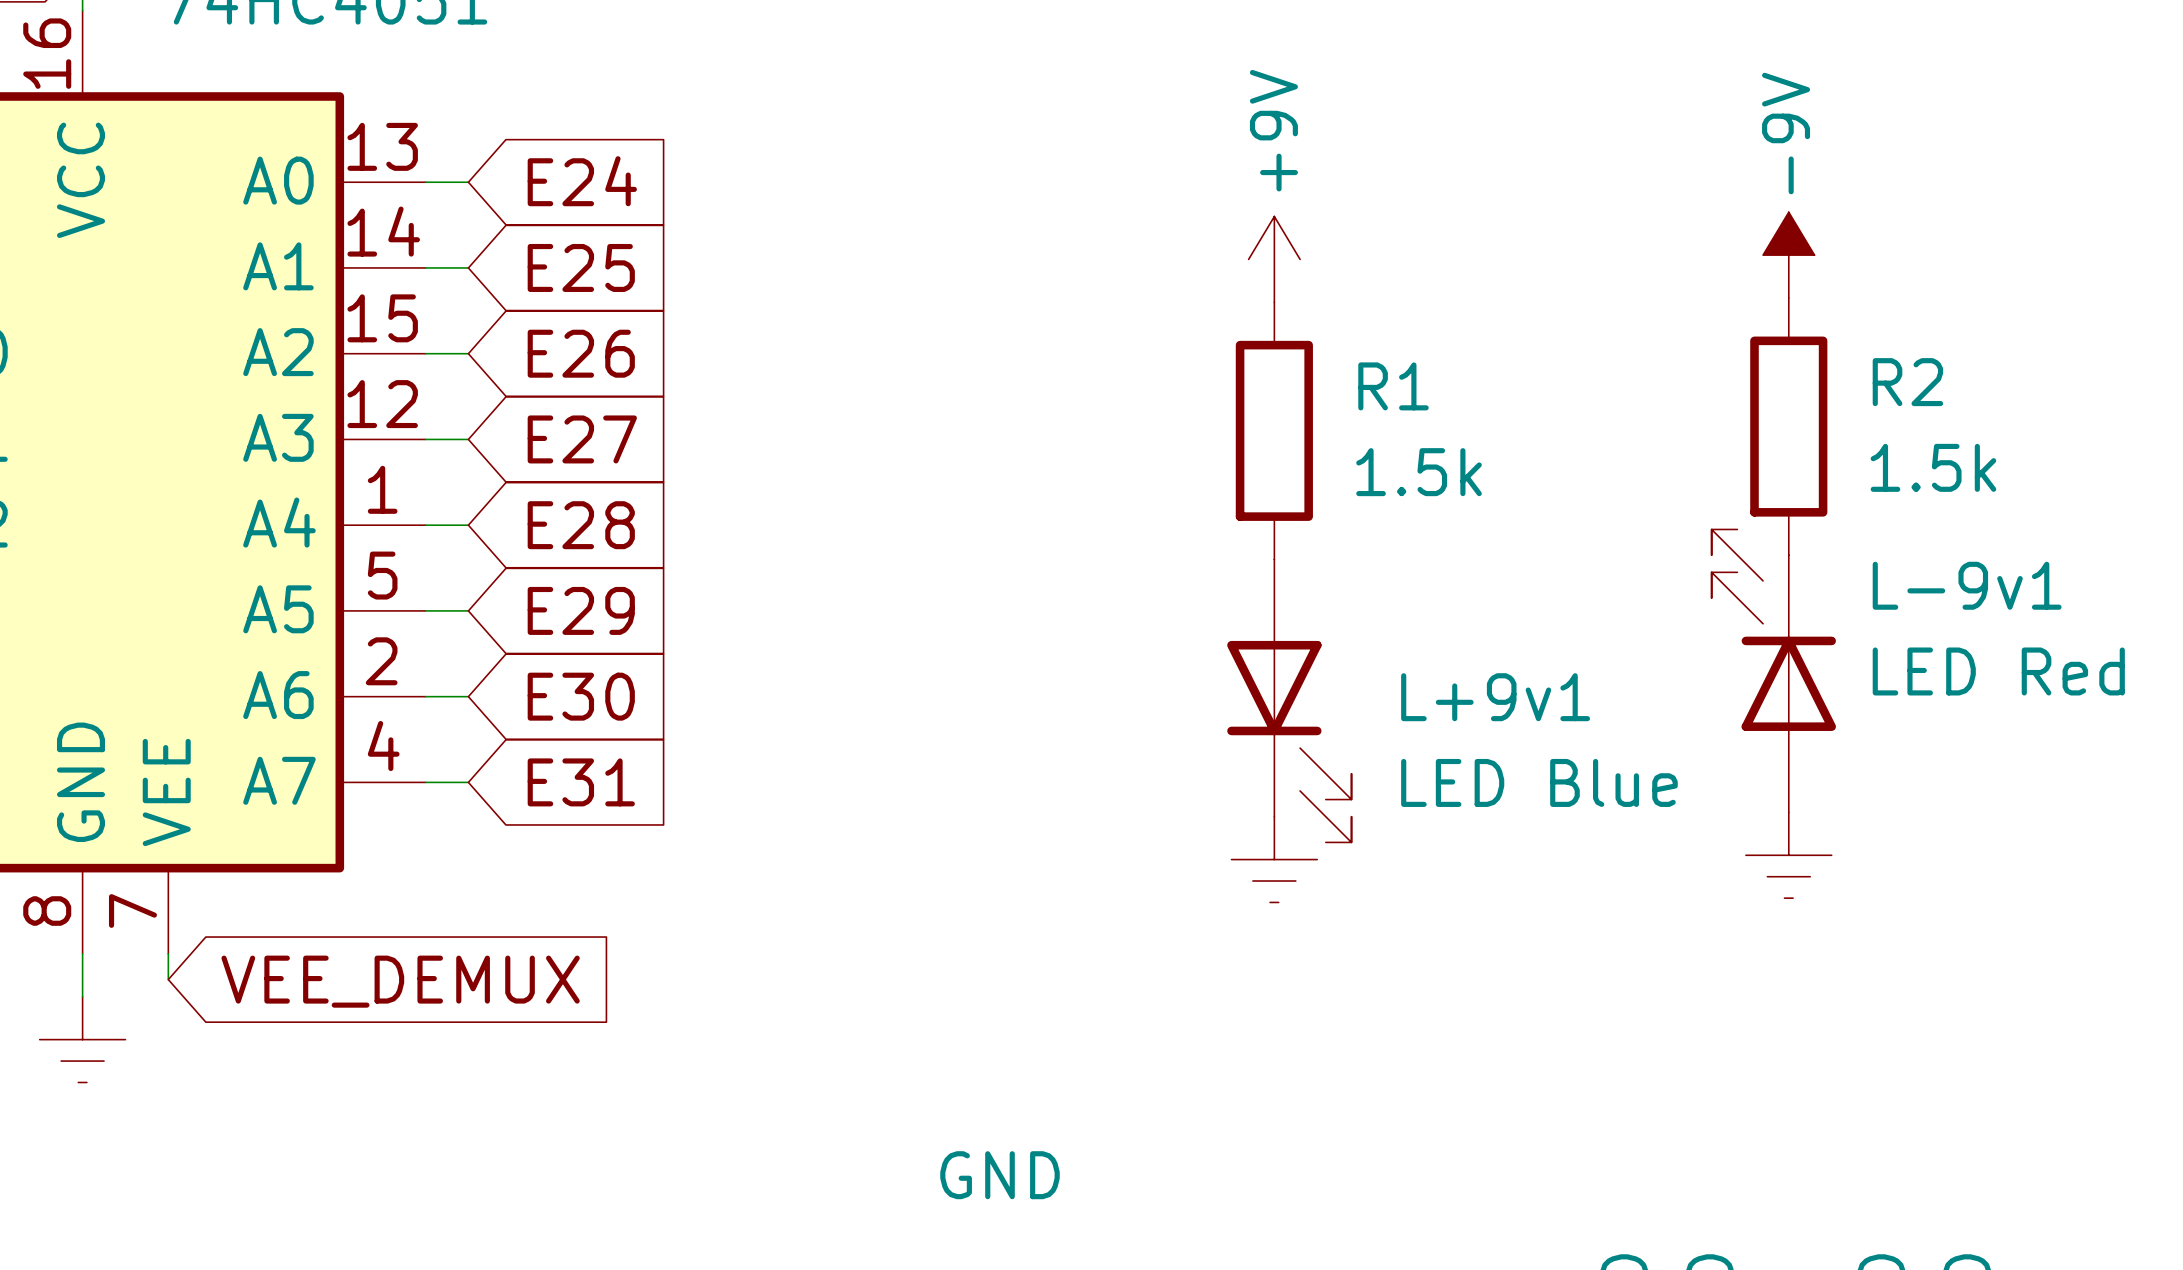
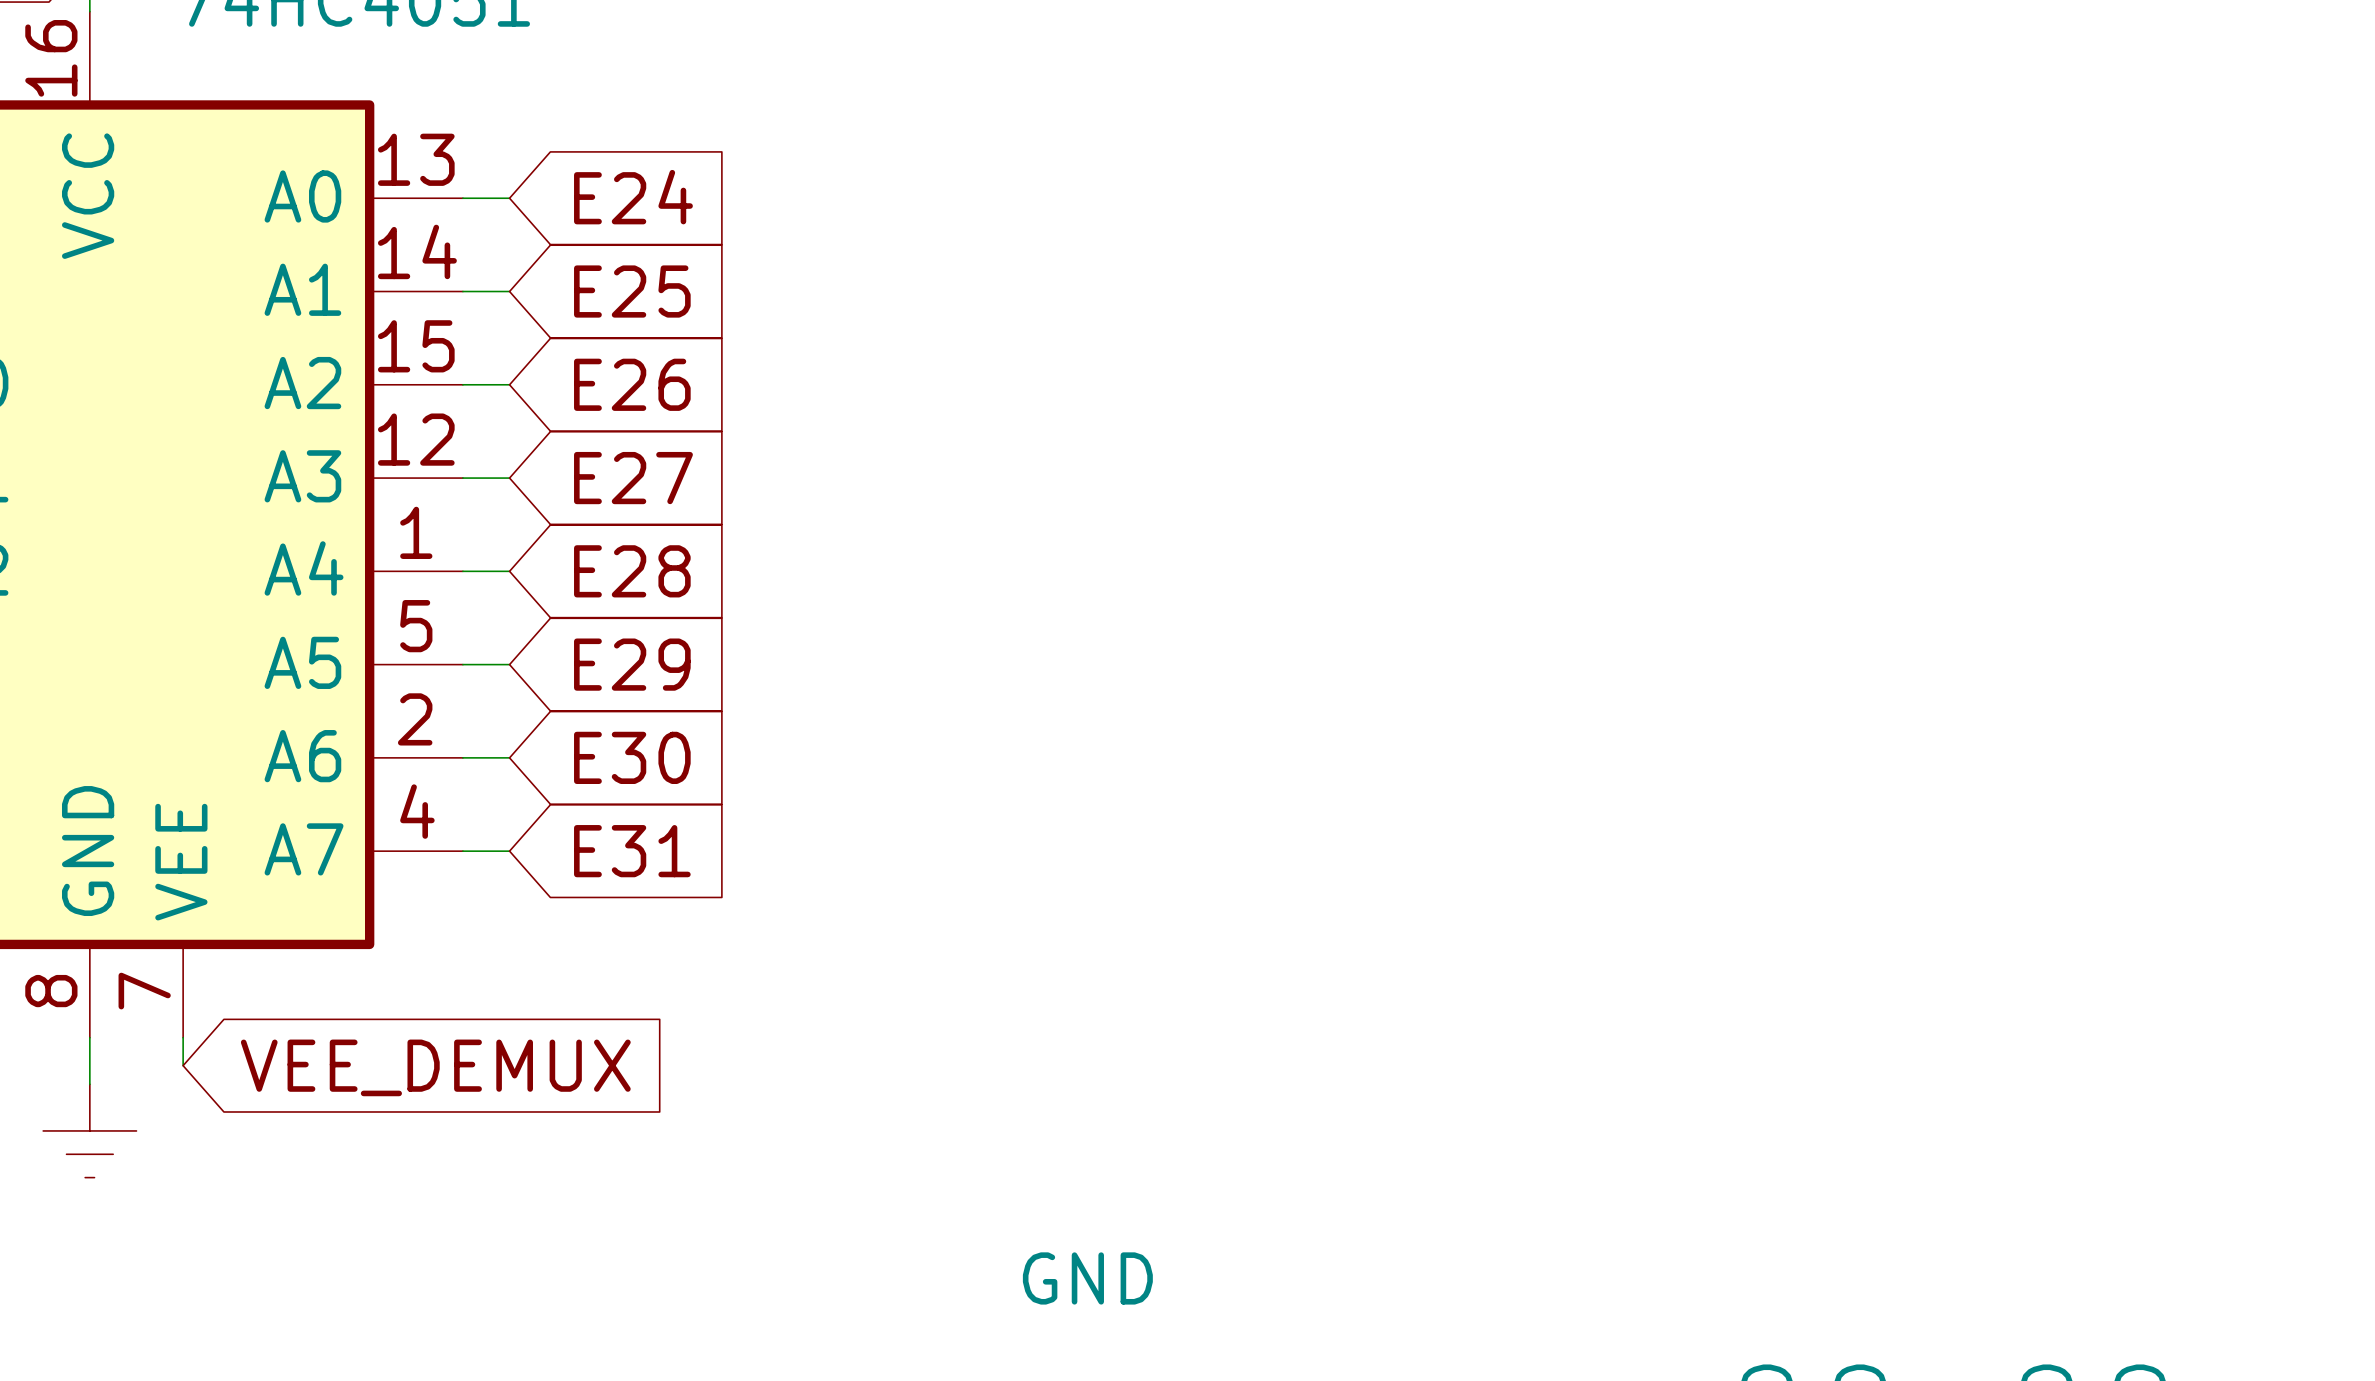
power symbol: -9V (1788, 255) -> none
power symbol: +9V (1274, 259) -> none
R2: 1.5k (1788, 426) -> none
R1: 1.5k (1274, 430) -> none
L-9v1: LED Red (1773, 670) -> none
L+9v1: LED Blue (1289, 700) -> none
power symbol: (1788, 855) -> none
power symbol: (1274, 859) -> none

